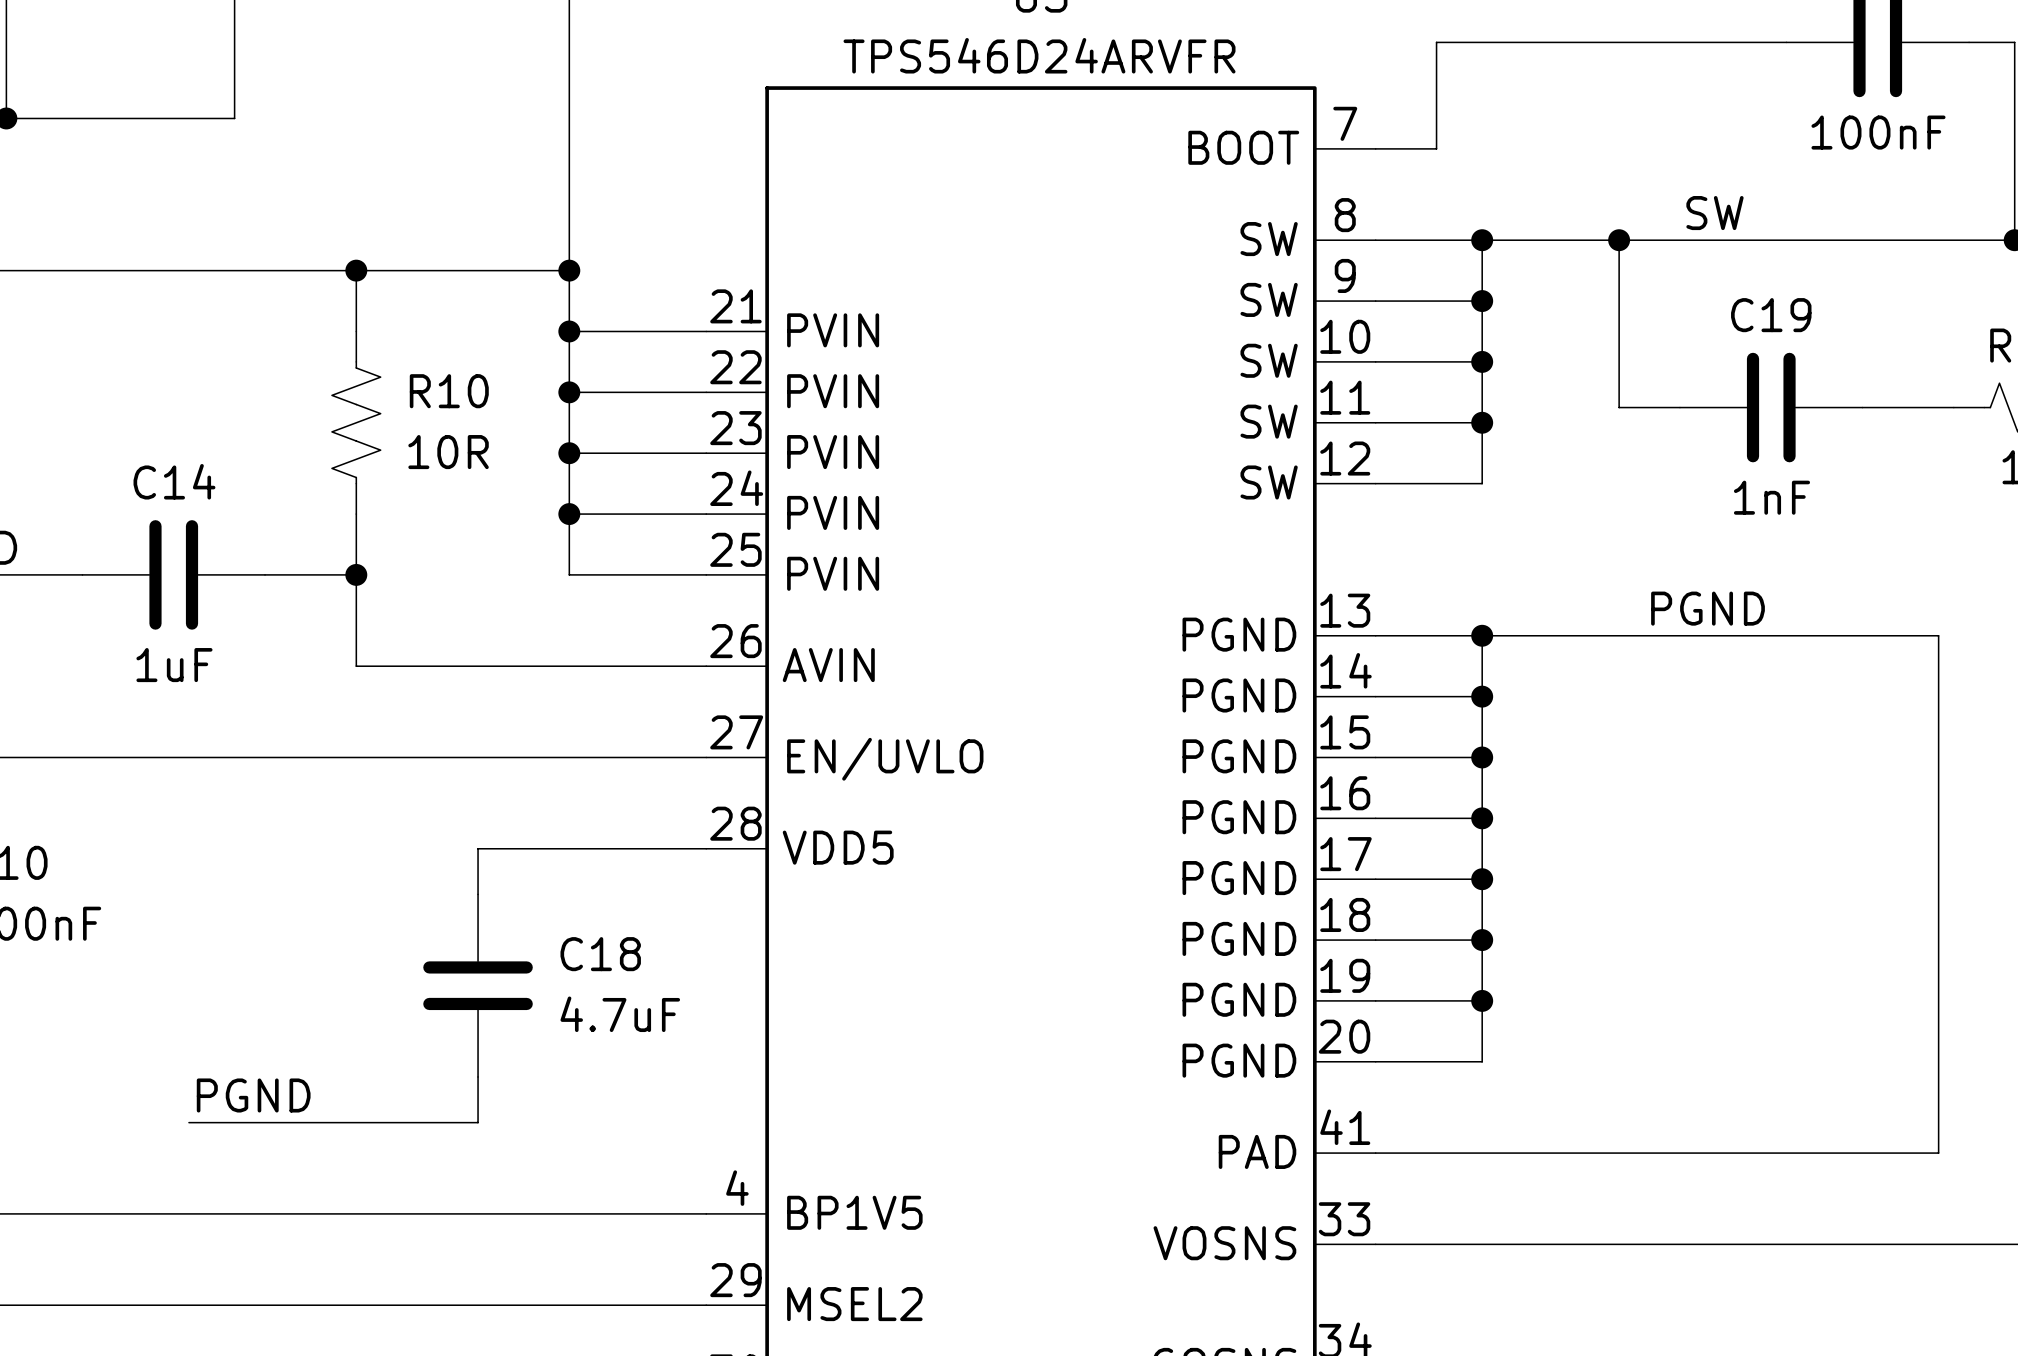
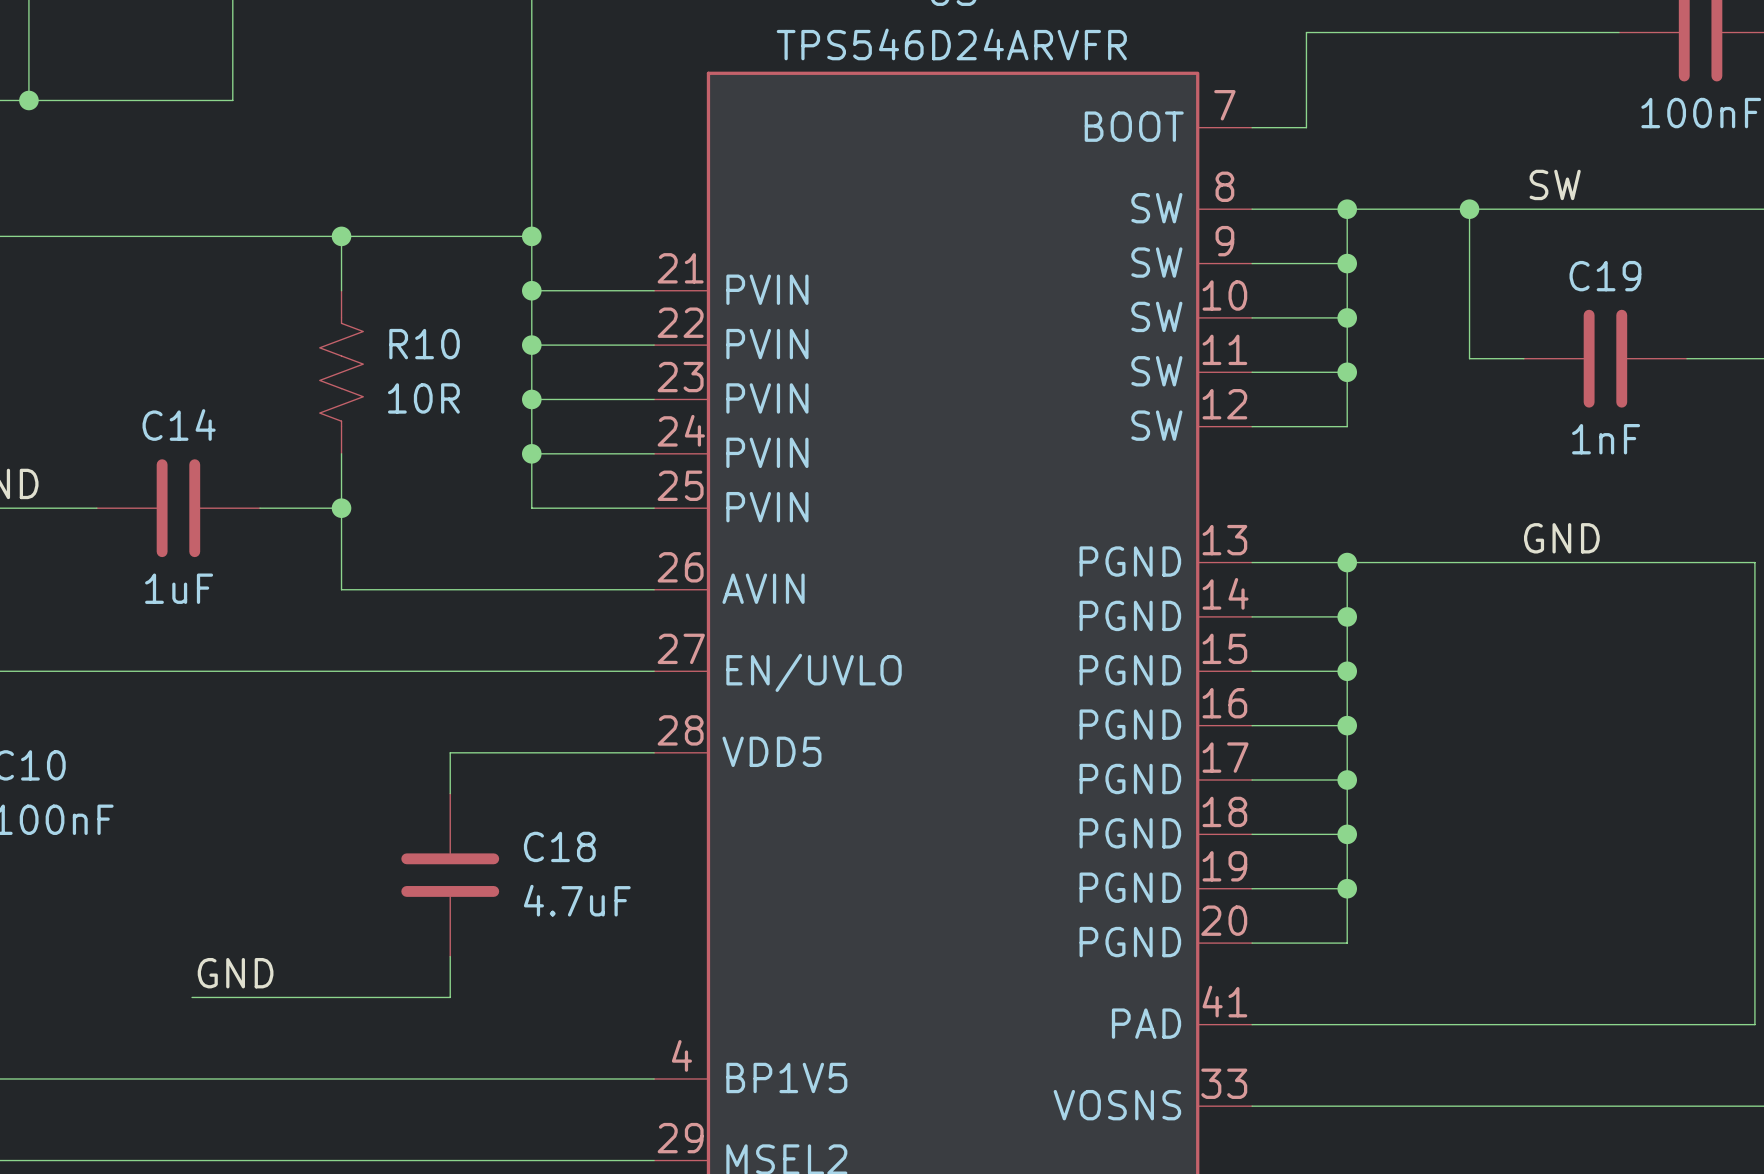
label: PGND (1708, 608) -> GND (1561, 538)
label: PGND (253, 1095) -> GND (235, 973)

